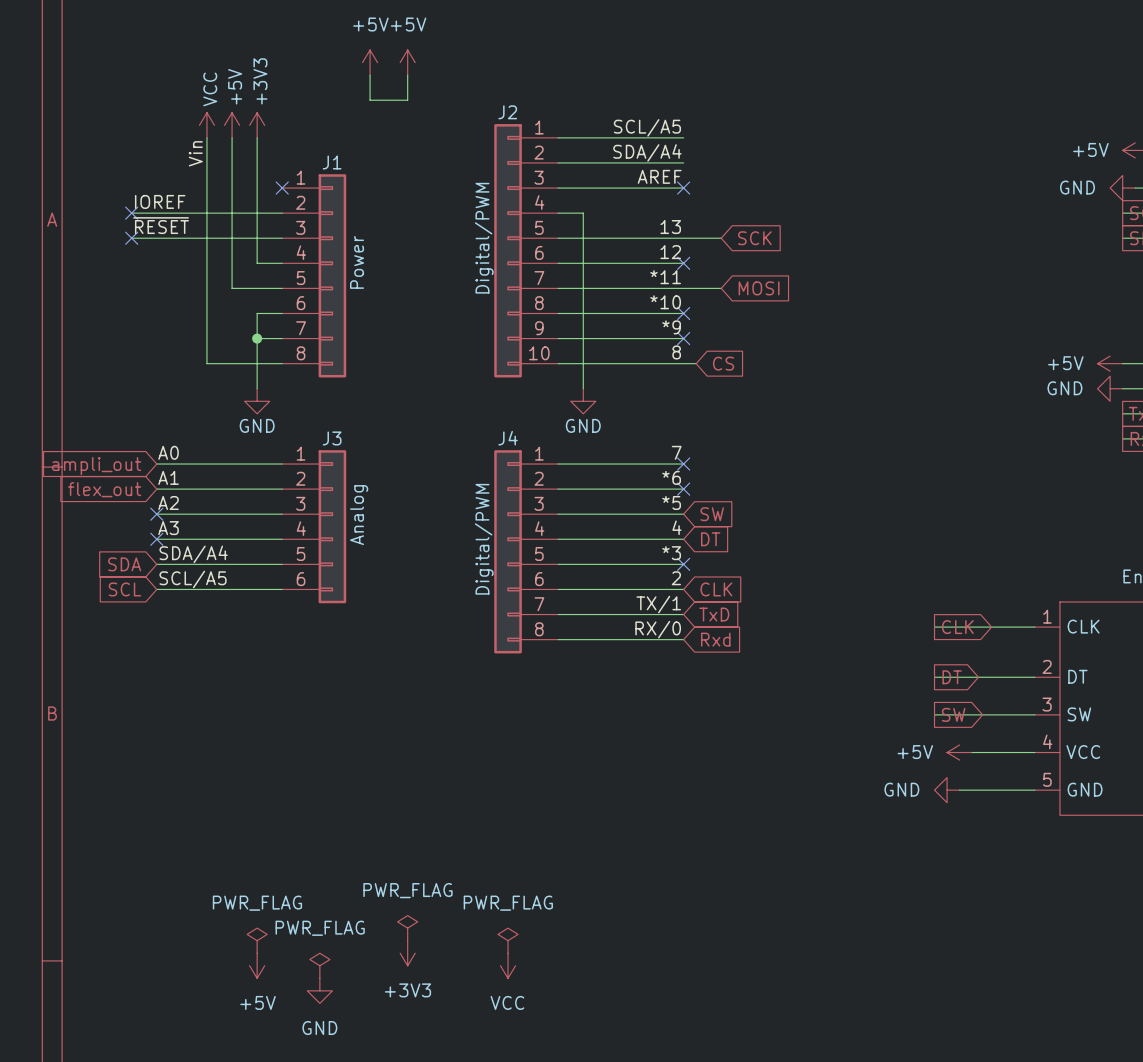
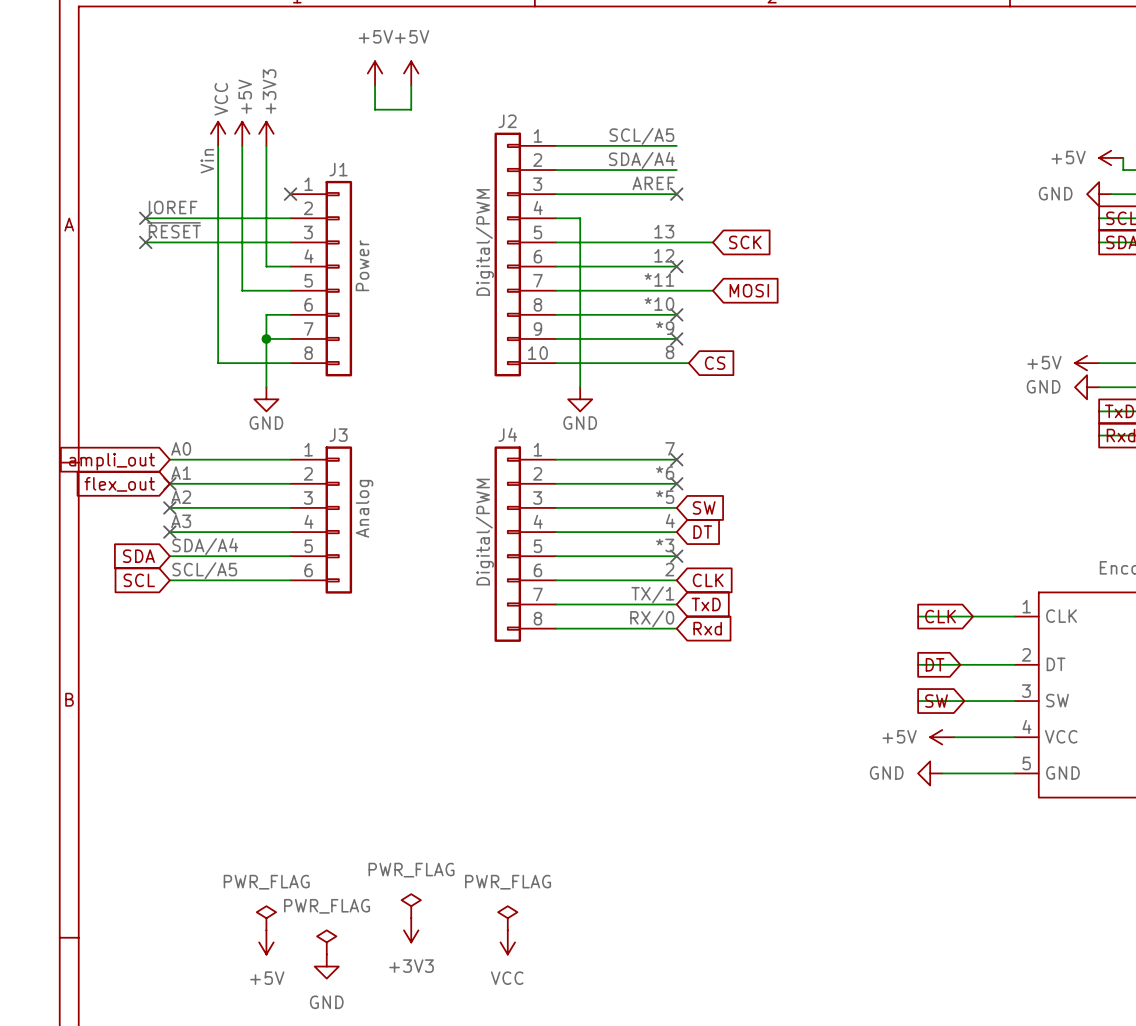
no-connect mark: none -> (169, 483)

